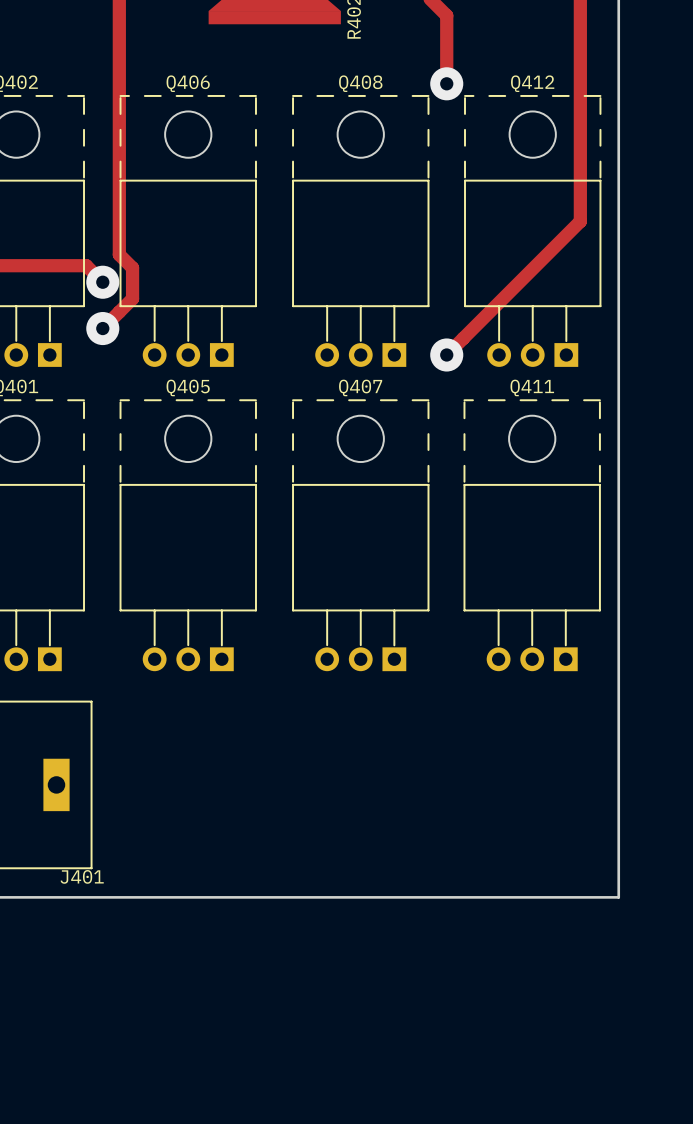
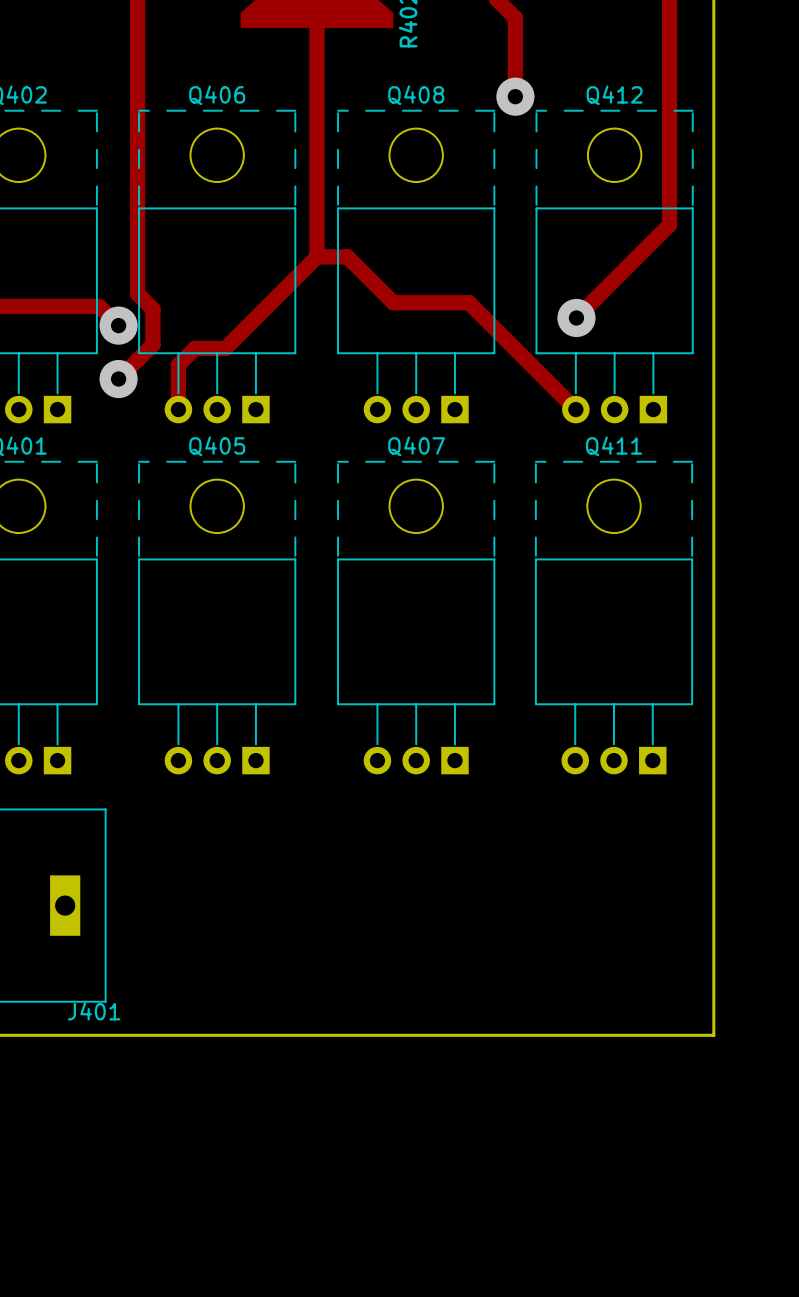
track: none -> (317, 20) (317, 256)
track: (580, 194) (580, 221) (446, 354) -> (669, 224) (576, 317)
track: none -> (317, 256) (225, 348) (194, 348) (178, 365) (178, 409)
track: none -> (317, 256) (347, 256) (393, 302) (469, 302) (575, 409)
via: none -> (576, 317)
via: (446, 354) -> none

